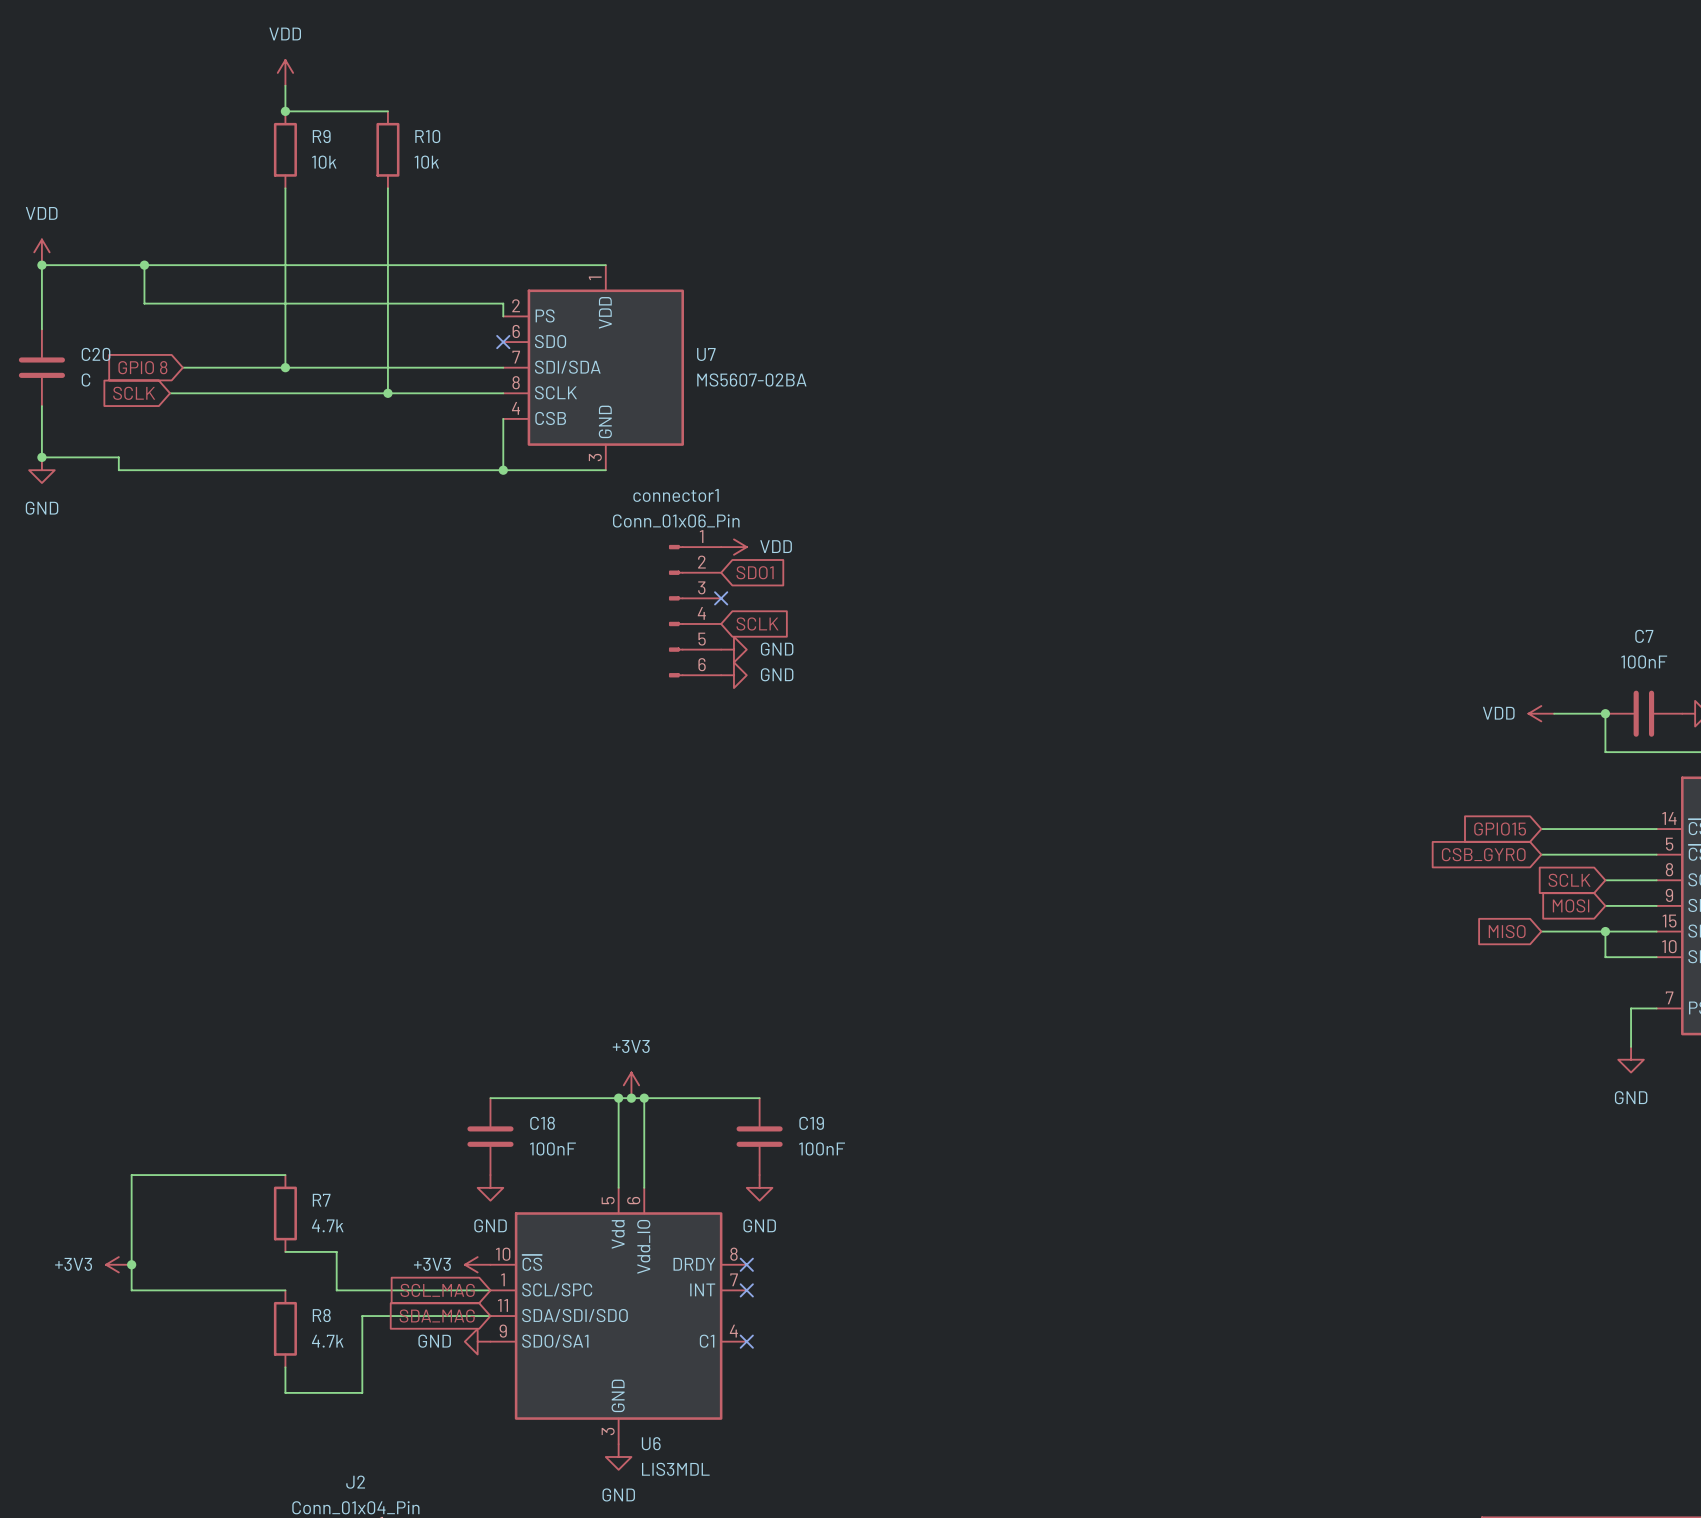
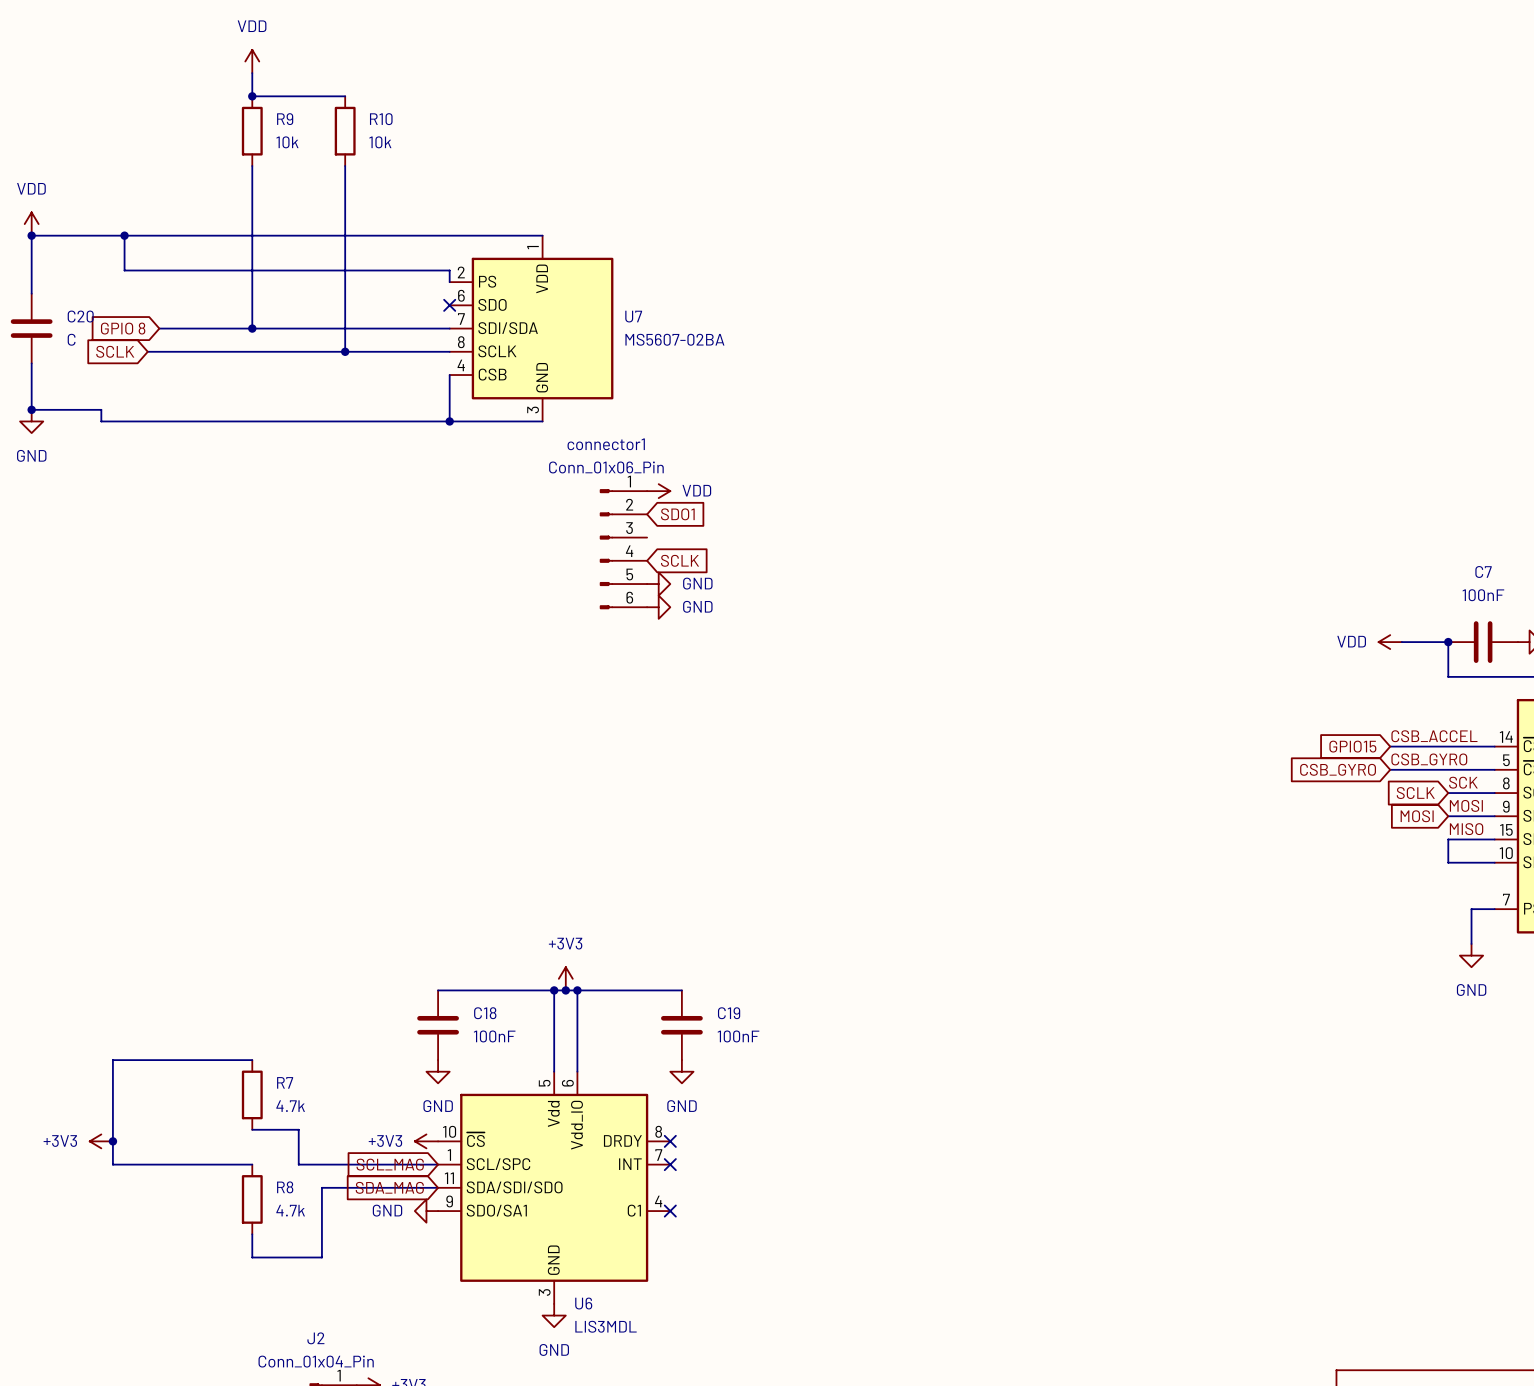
no-connect mark: (721, 598) -> none
label: none -> CSB_ACCEL (1434, 736)
label: none -> CSB_GYRO (1429, 759)
label: none -> SCK (1463, 782)
label: none -> MOSI (1466, 805)
label: none -> MISO (1466, 829)
global label: MISO (1507, 931) -> none
wire: (1541, 931) (1605, 931) -> none
junction: (1605, 931) -> none

